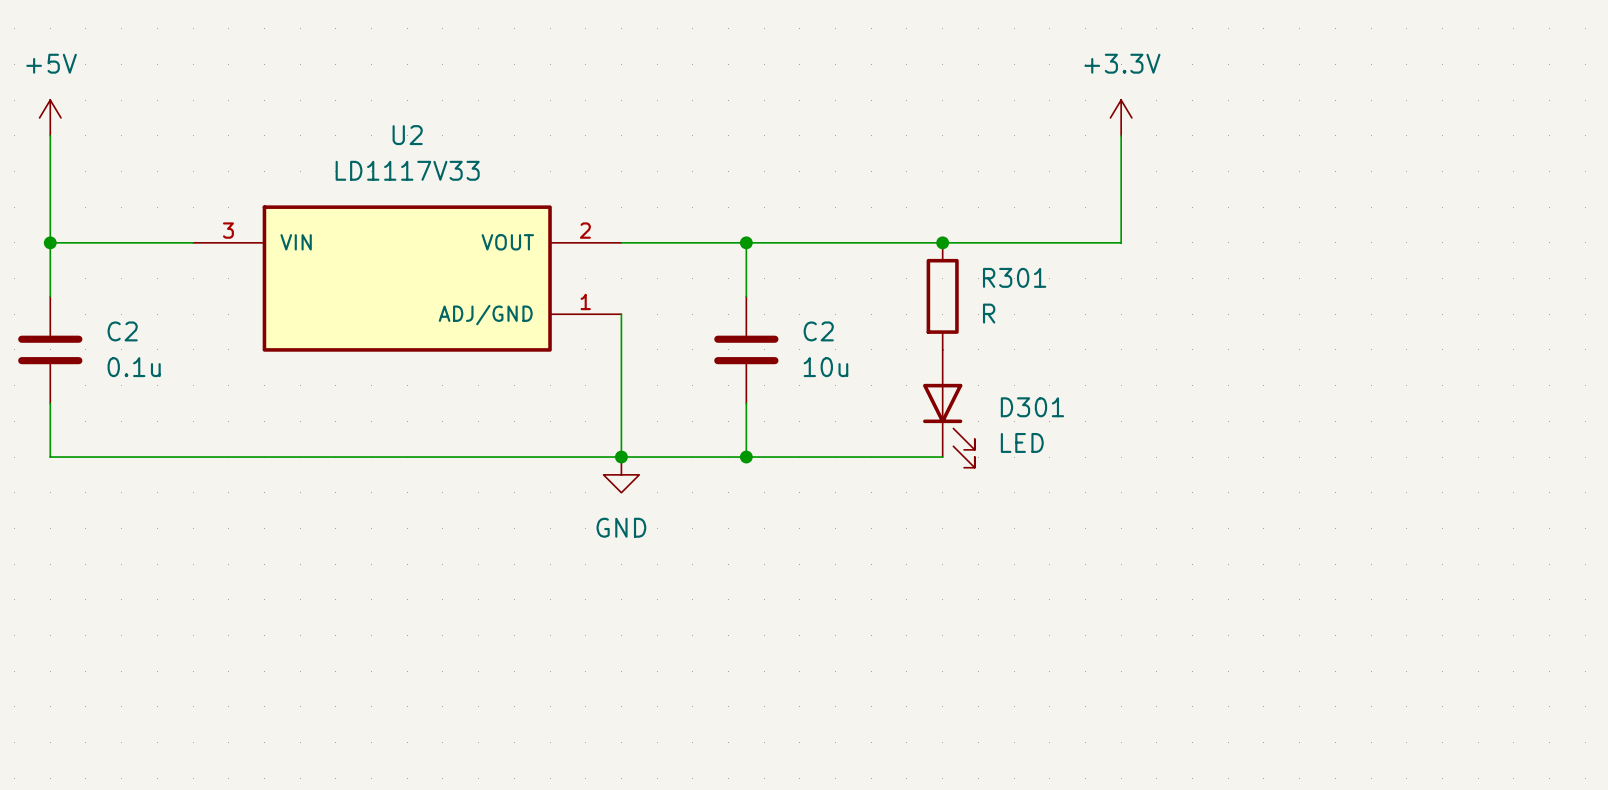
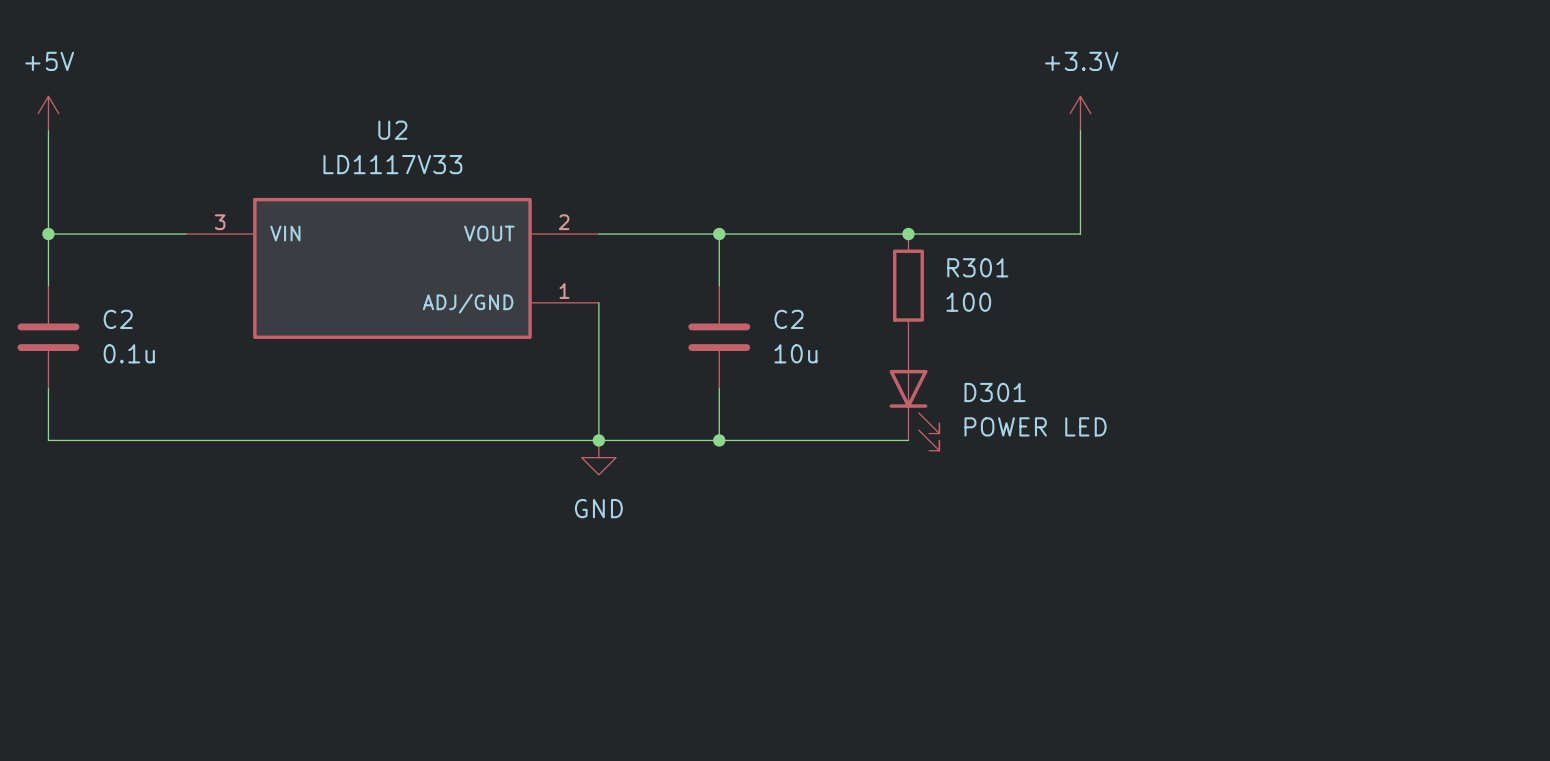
R301 value: R (989, 313) -> 100 (968, 302)
D301 value: LED (1022, 442) -> POWER LED (1035, 426)

